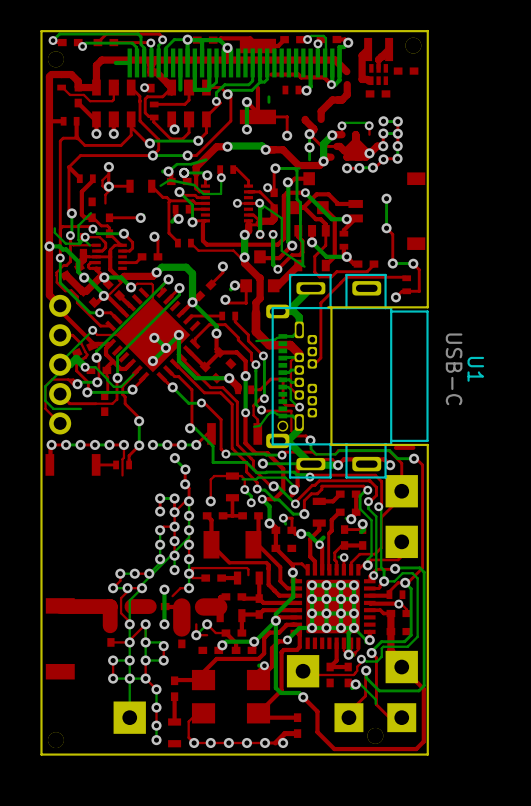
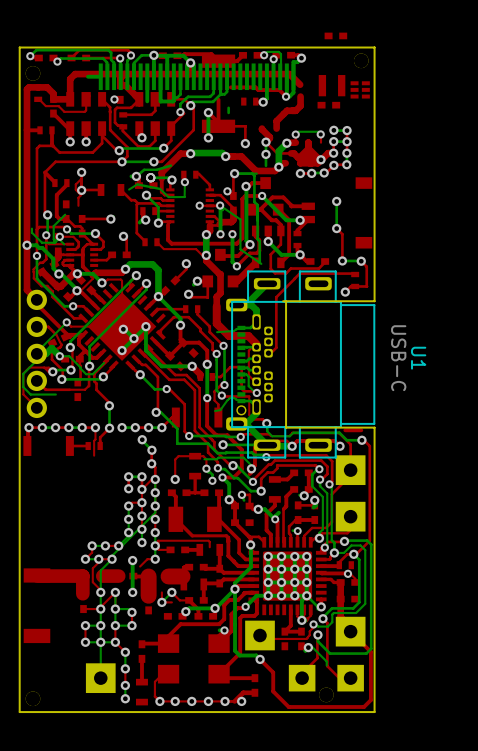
part: none -> (335, 35)
top track: (368, 49) (362, 55) (362, 79) (369, 81) -> none
part: (378, 49) -> none
top track: (389, 49) (378, 59) (378, 68) -> none
part footprint: [369, 64, 389, 86] -> [318, 75, 346, 97]
part footprint: [393, 67, 419, 75] -> [350, 81, 370, 99]

